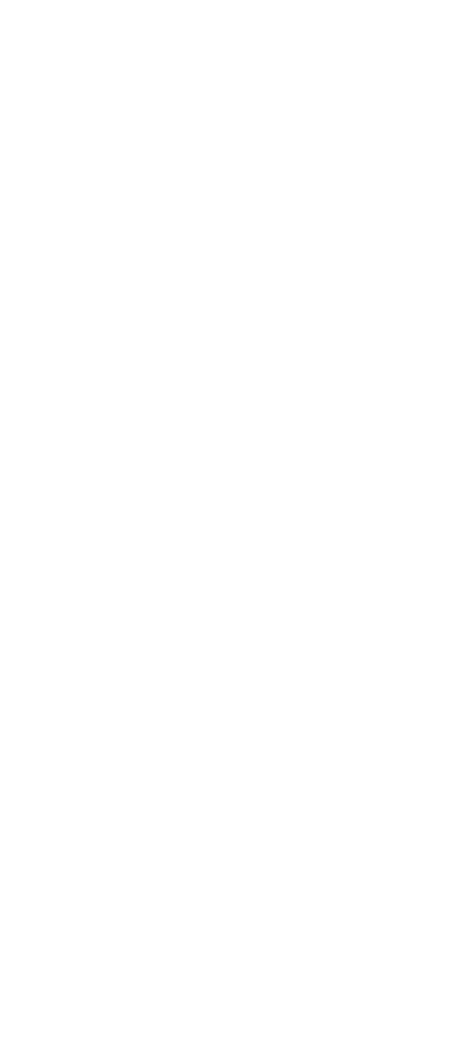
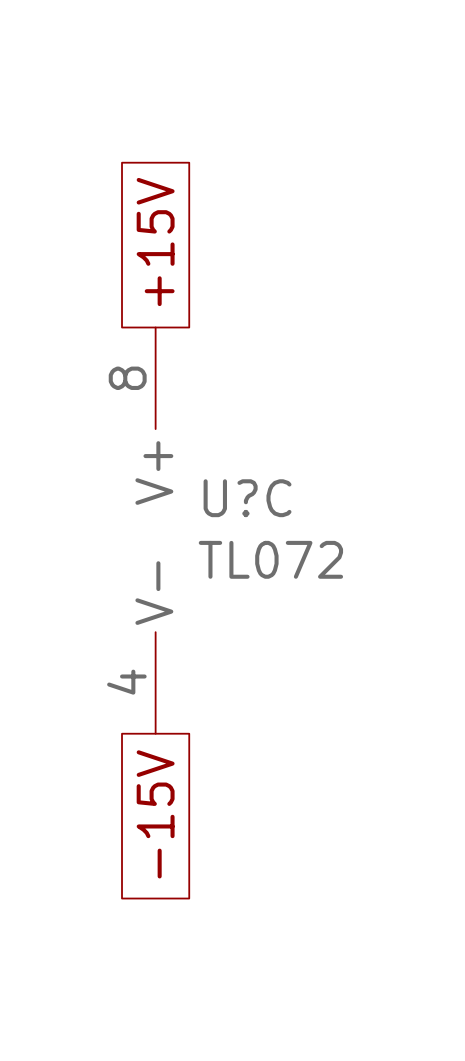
global label: none -> +15V (155, 242)
U?C: none -> TL072 (155, 530)
global label: none -> -15V (155, 814)

